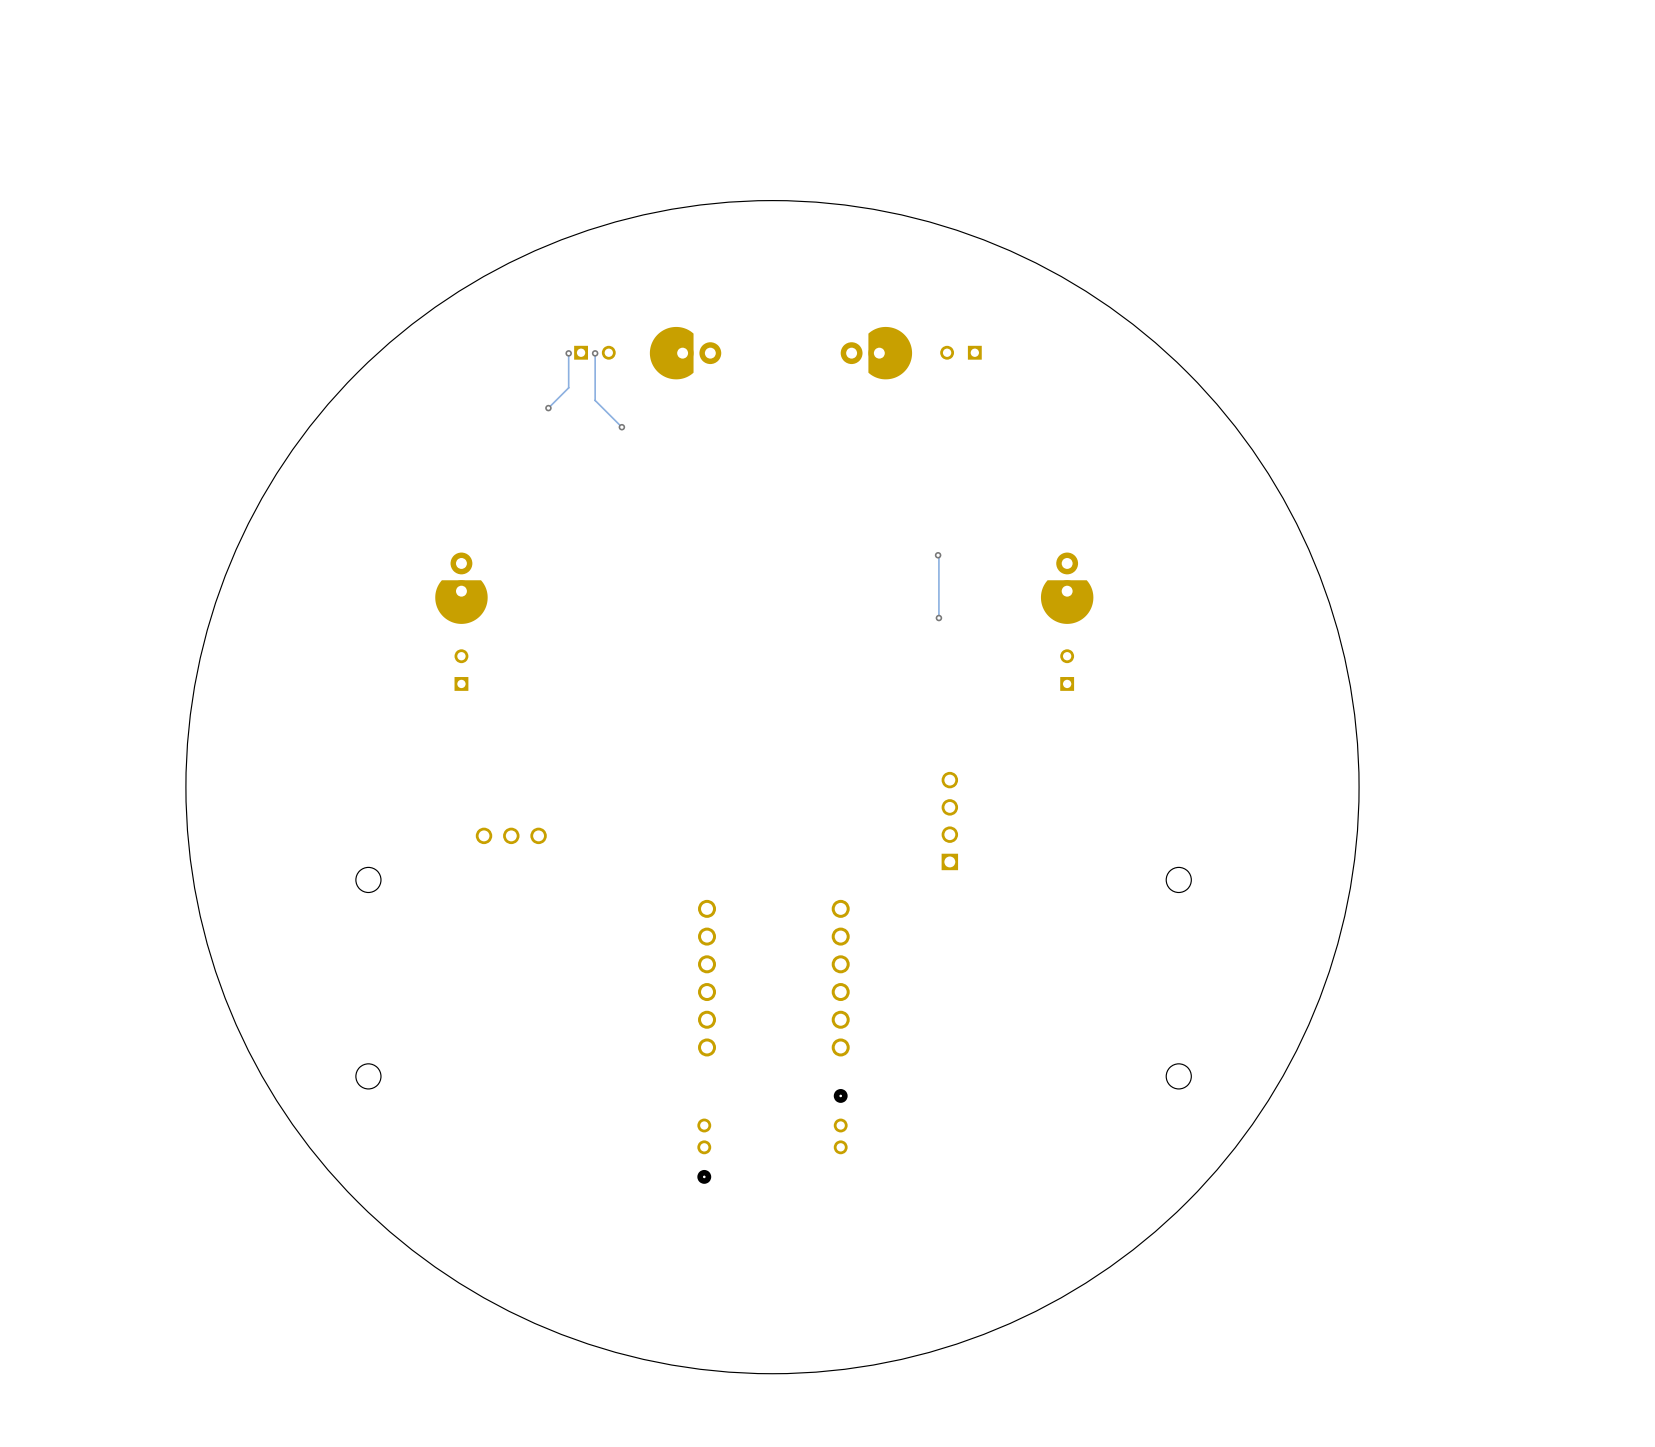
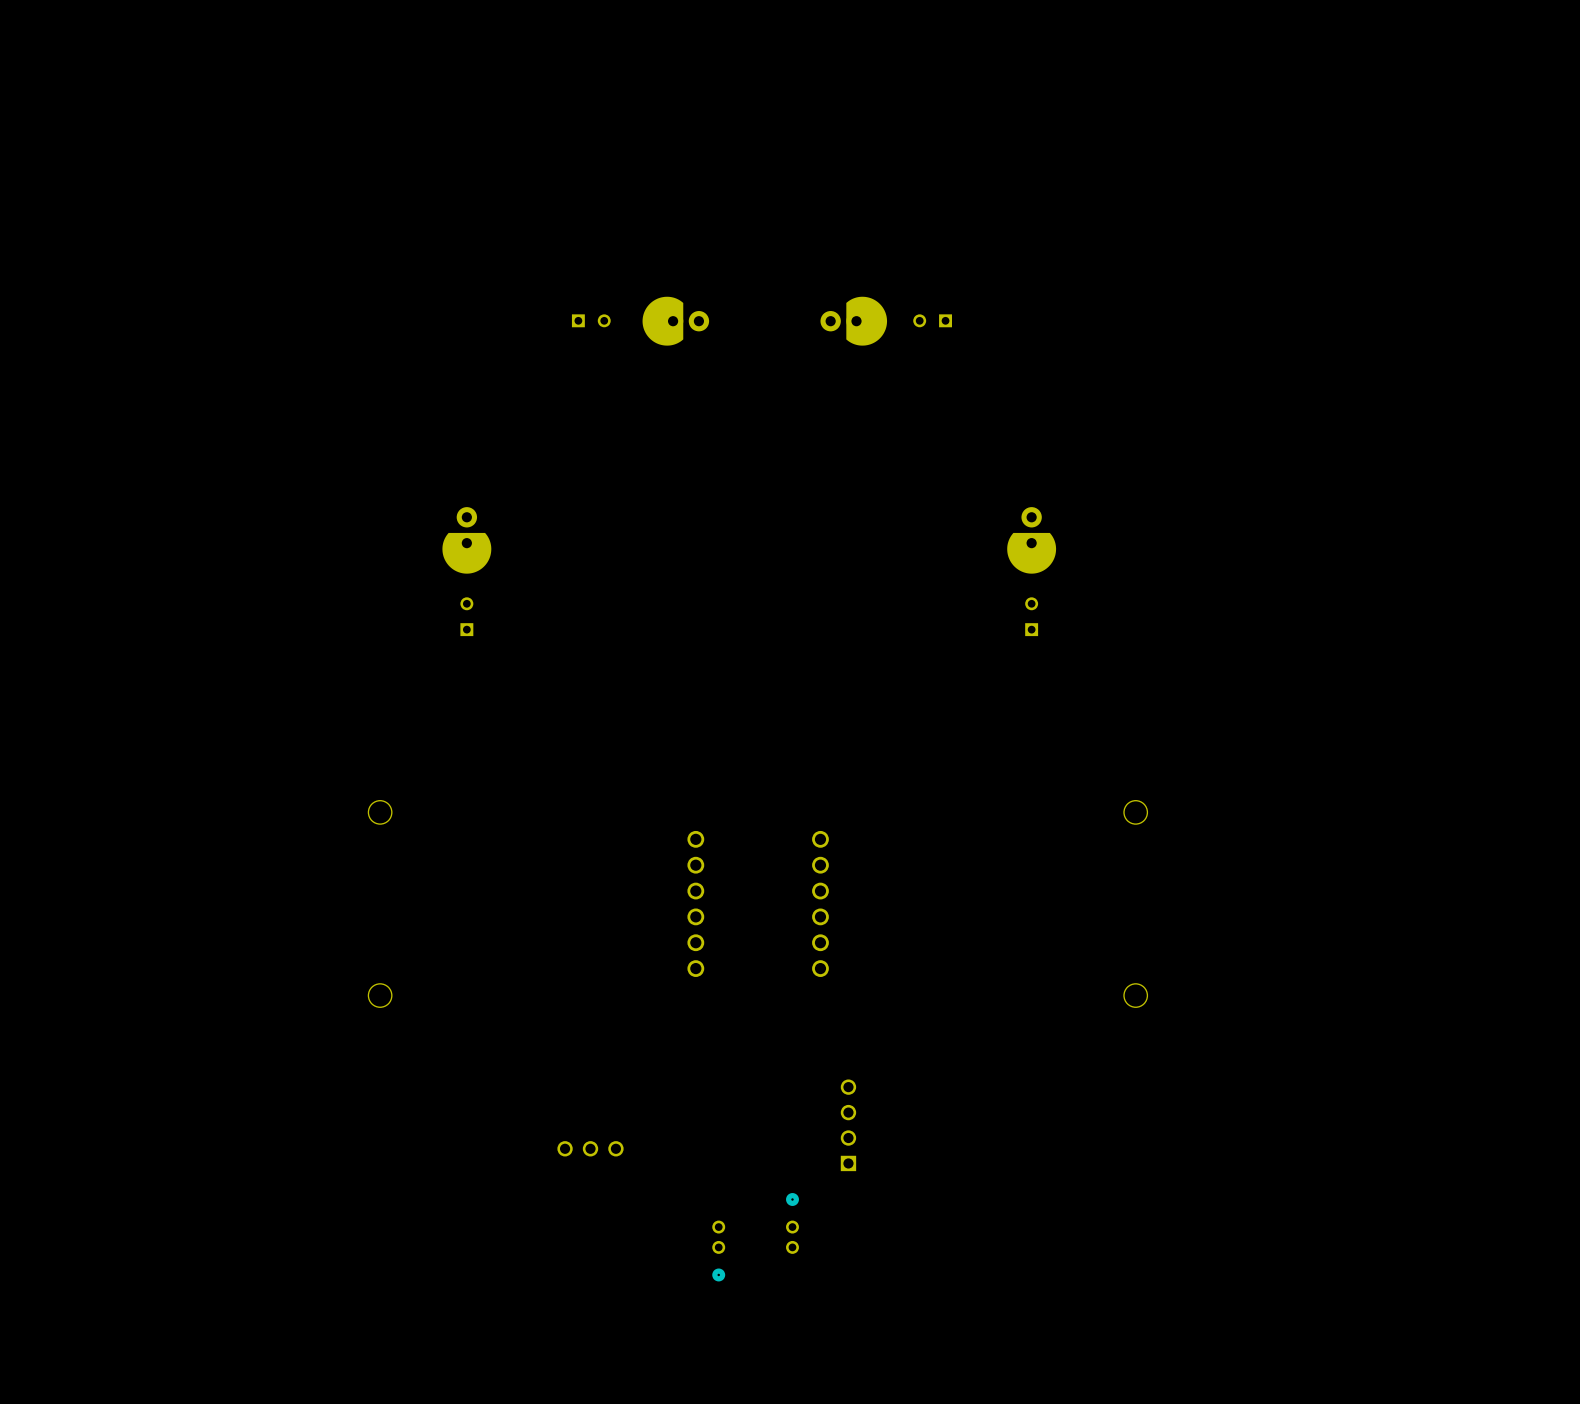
round board edge: [185, 200, 1360, 1374] -> none
track: (568, 353) (568, 387) (548, 408) -> none
via: (568, 353) -> none
track: (595, 353) (595, 400) (621, 427) -> none
via: (595, 353) -> none
via: (548, 408) -> none
via: (621, 427) -> none
track: (938, 555) (938, 618) -> none
via: (938, 555) -> none
via: (938, 618) -> none
part: (949, 821) -> none
part: (511, 835) -> none
part: (840, 1121) -> none
part: (704, 1151) -> none
part: none -> (848, 1125)
part: none -> (590, 1148)
part: none -> (792, 1223)
part: none -> (718, 1251)

